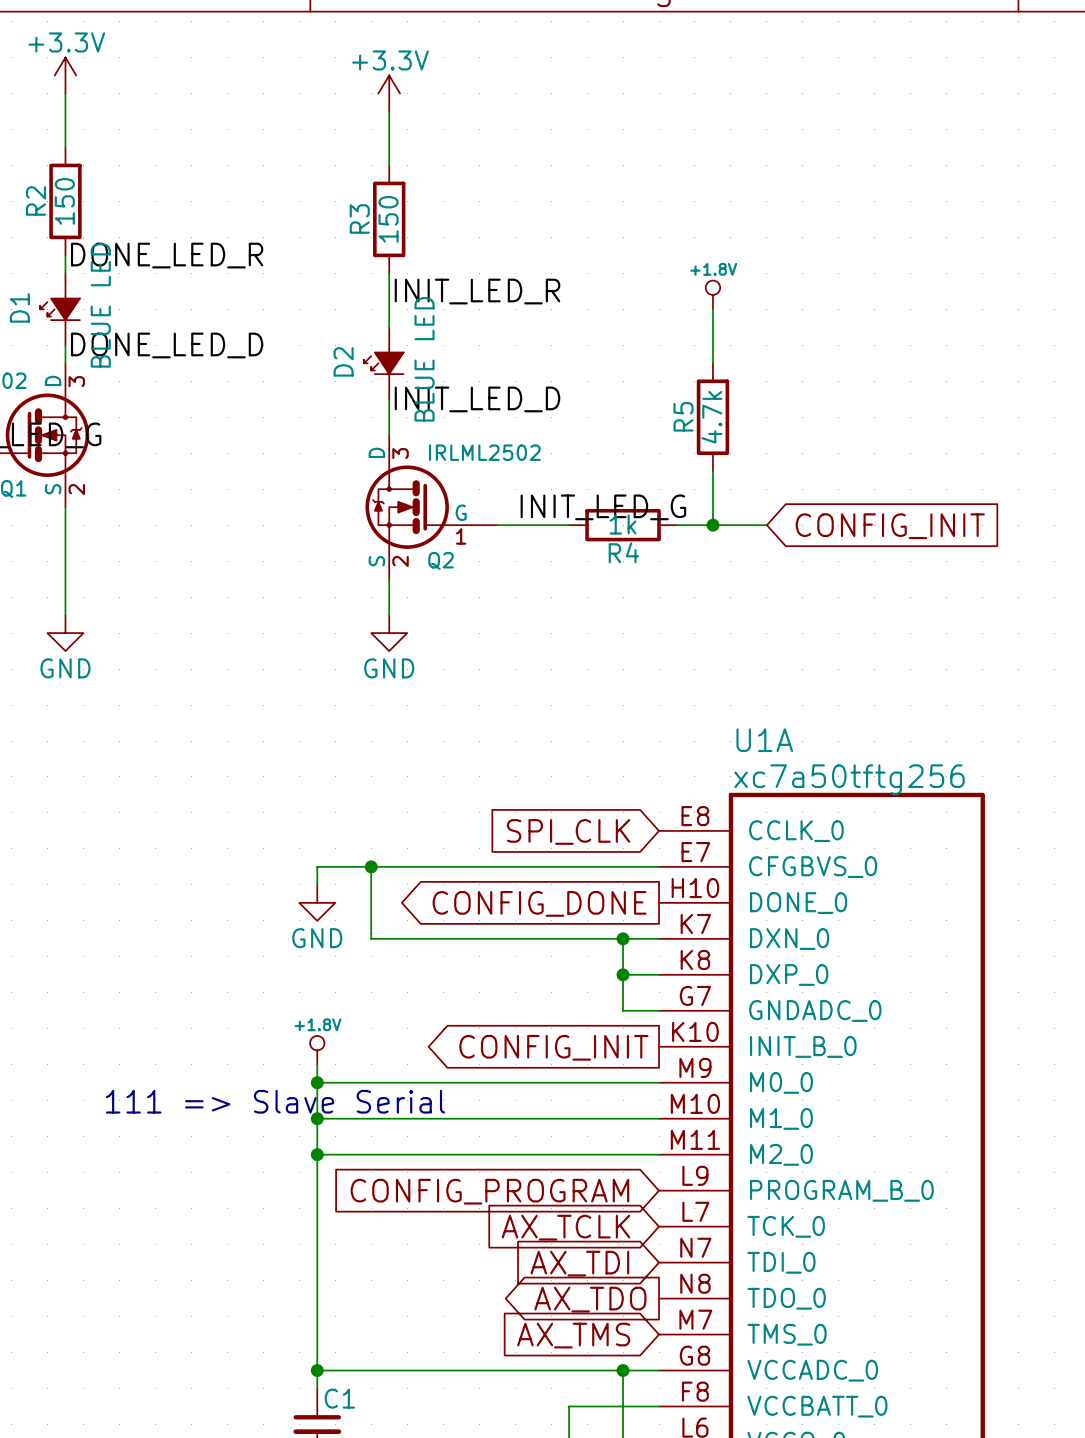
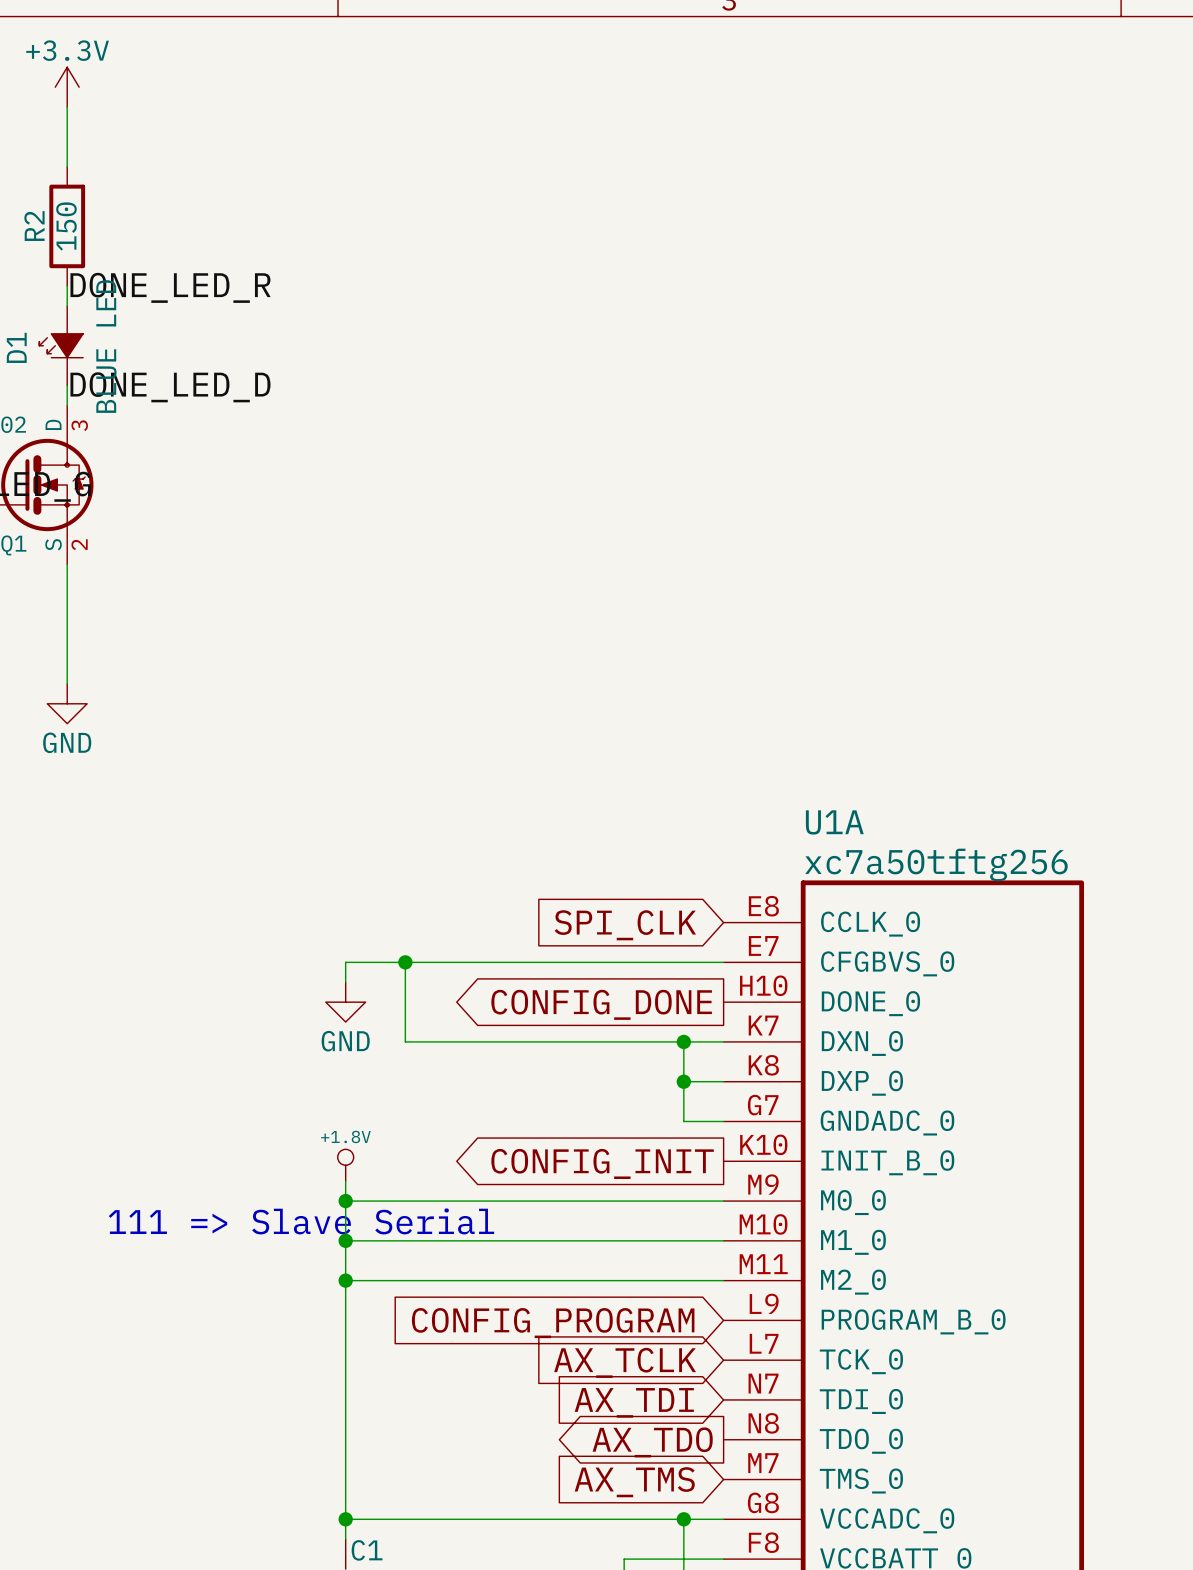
power symbol: +3.3V (389, 93) -> none
wire: (389, 111) (389, 165) -> none
R3: 150 (389, 219) -> none
wire: (389, 273) (389, 327) -> none
label: INIT_LED_R (477, 291) -> none
power symbol: +1.8V (712, 294) -> none
wire: (712, 309) (712, 363) -> none
D2: BLUE LED (383, 363) -> none
wire: (389, 399) (389, 435) -> none
label: INIT_LED_D (477, 399) -> none
R5: 4.7k (712, 417) -> none
wire: (712, 471) (712, 525) -> none
Q2: IRLML2502 (431, 507) -> none
label: INIT_LED_G (603, 507) -> none
wire: (497, 525) (569, 525) -> none
R4: 1k (623, 525) -> none
wire: (677, 525) (766, 525) -> none
junction: (712, 525) -> none
global label: CONFIG_INIT (890, 526) -> none
wire: (389, 579) (389, 615) -> none
power symbol: GND (389, 633) -> none

